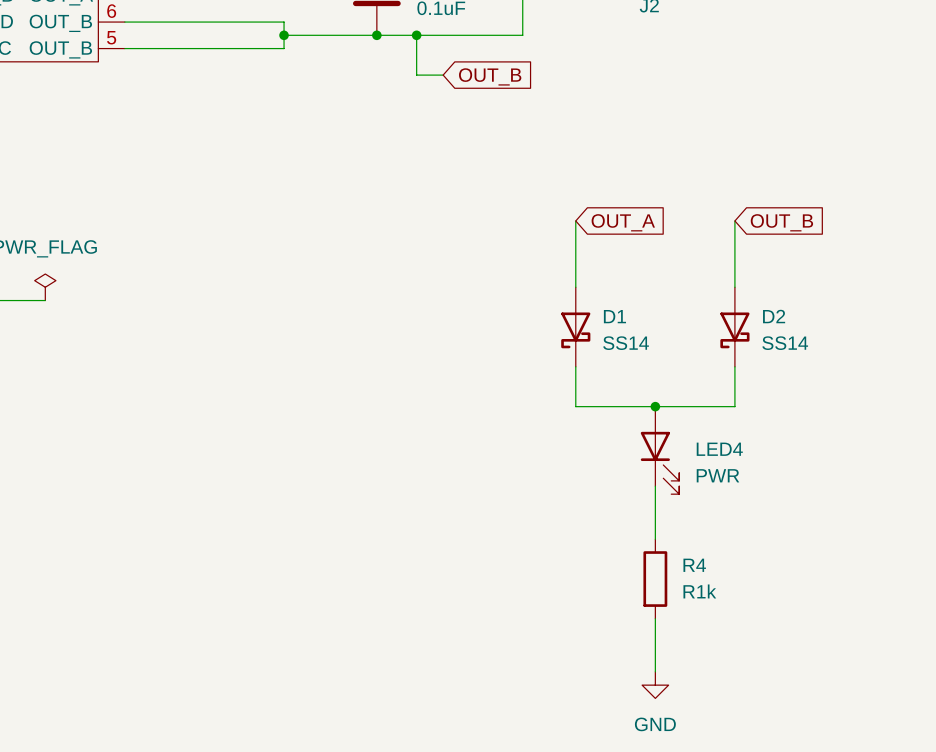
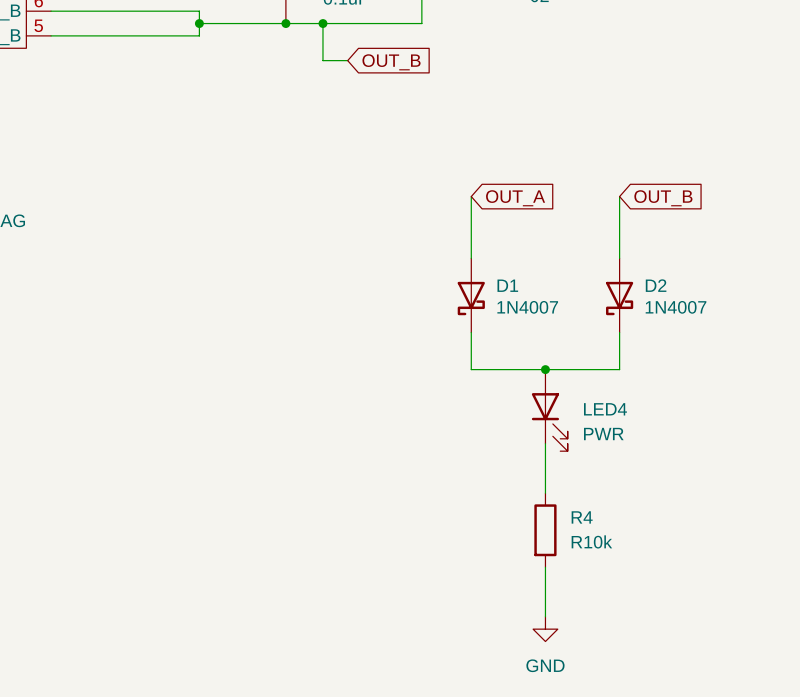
D1 value: SS14 (626, 343) -> 1N4007 (527, 307)
D2 value: SS14 (785, 343) -> 1N4007 (676, 307)
R4 value: R1k (699, 591) -> R10k (591, 541)

